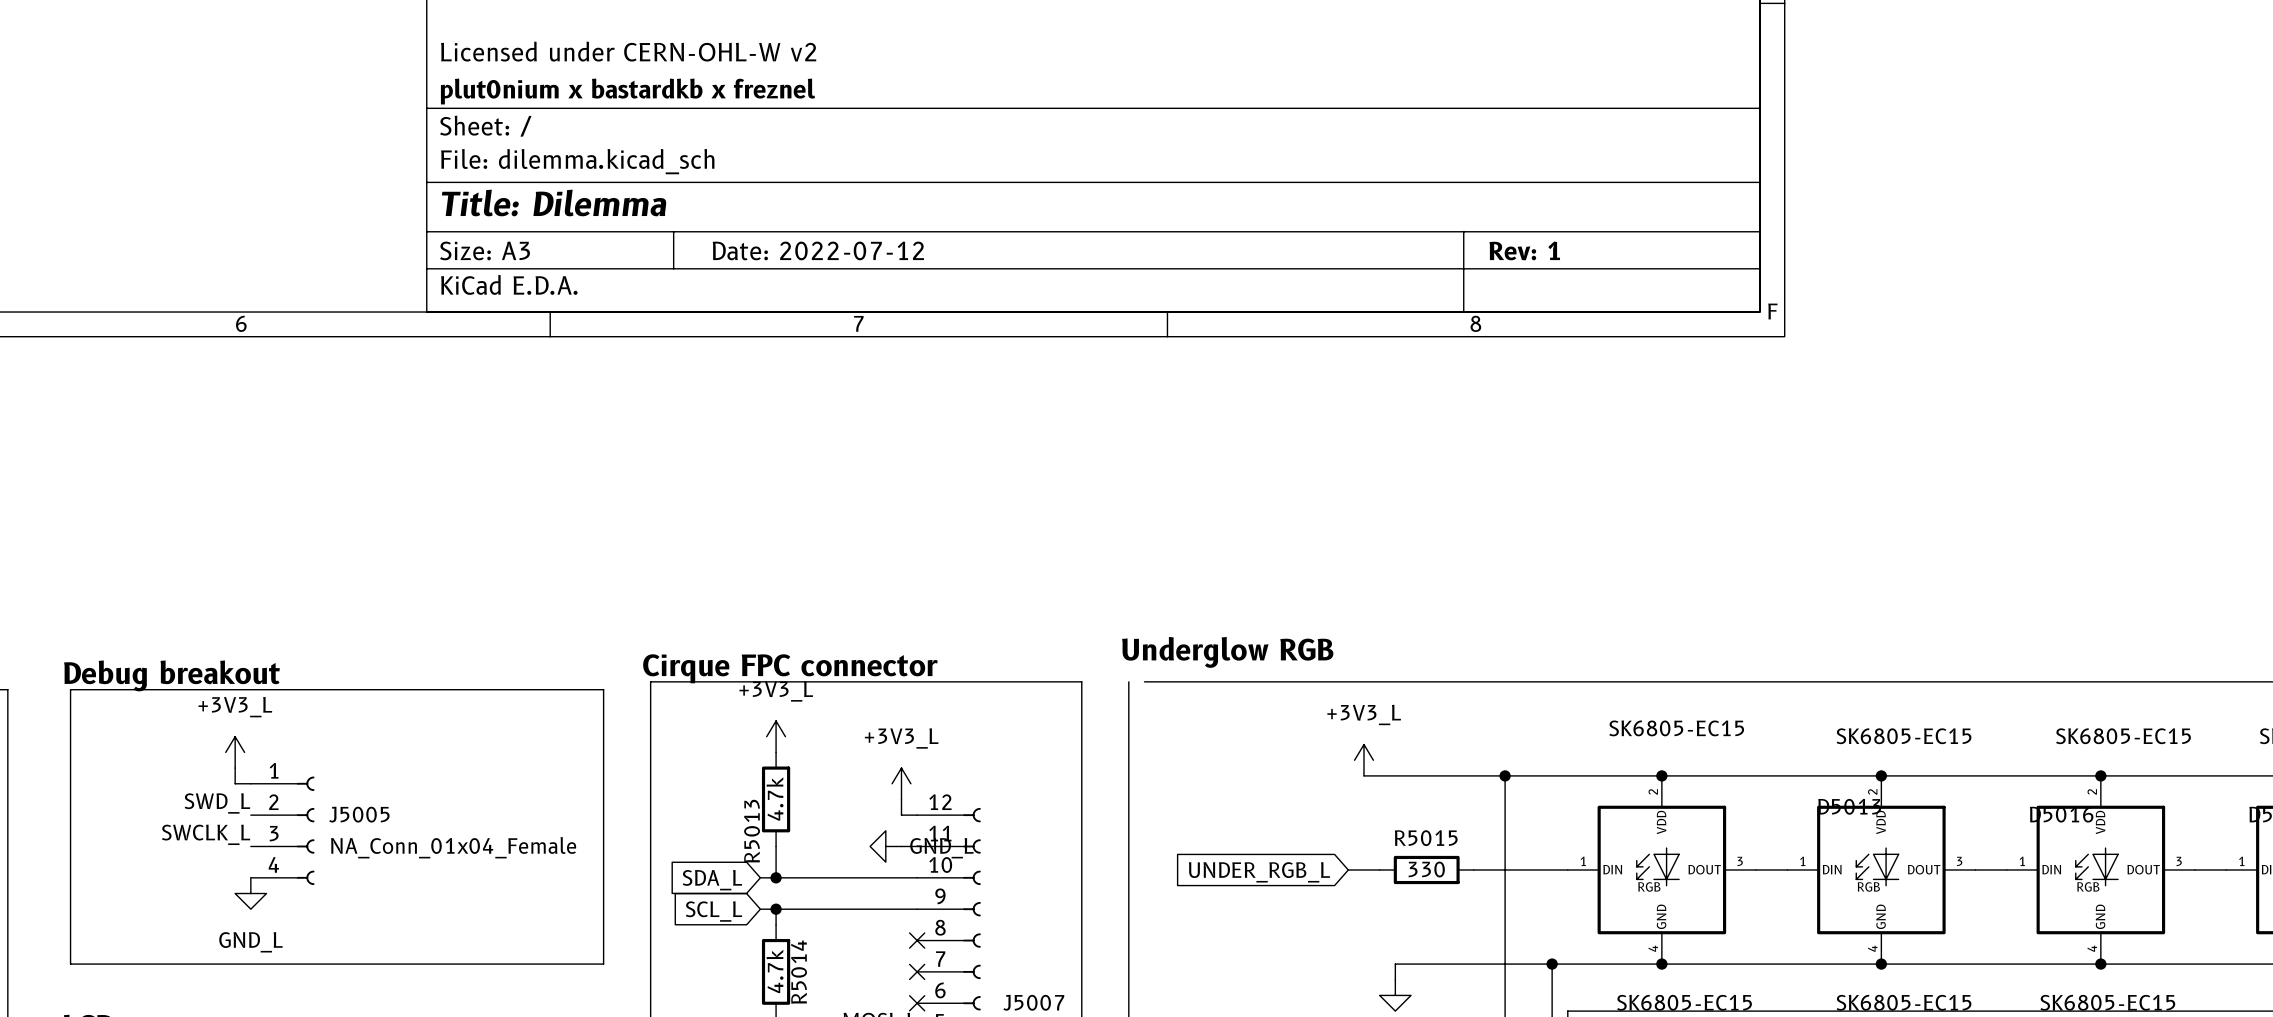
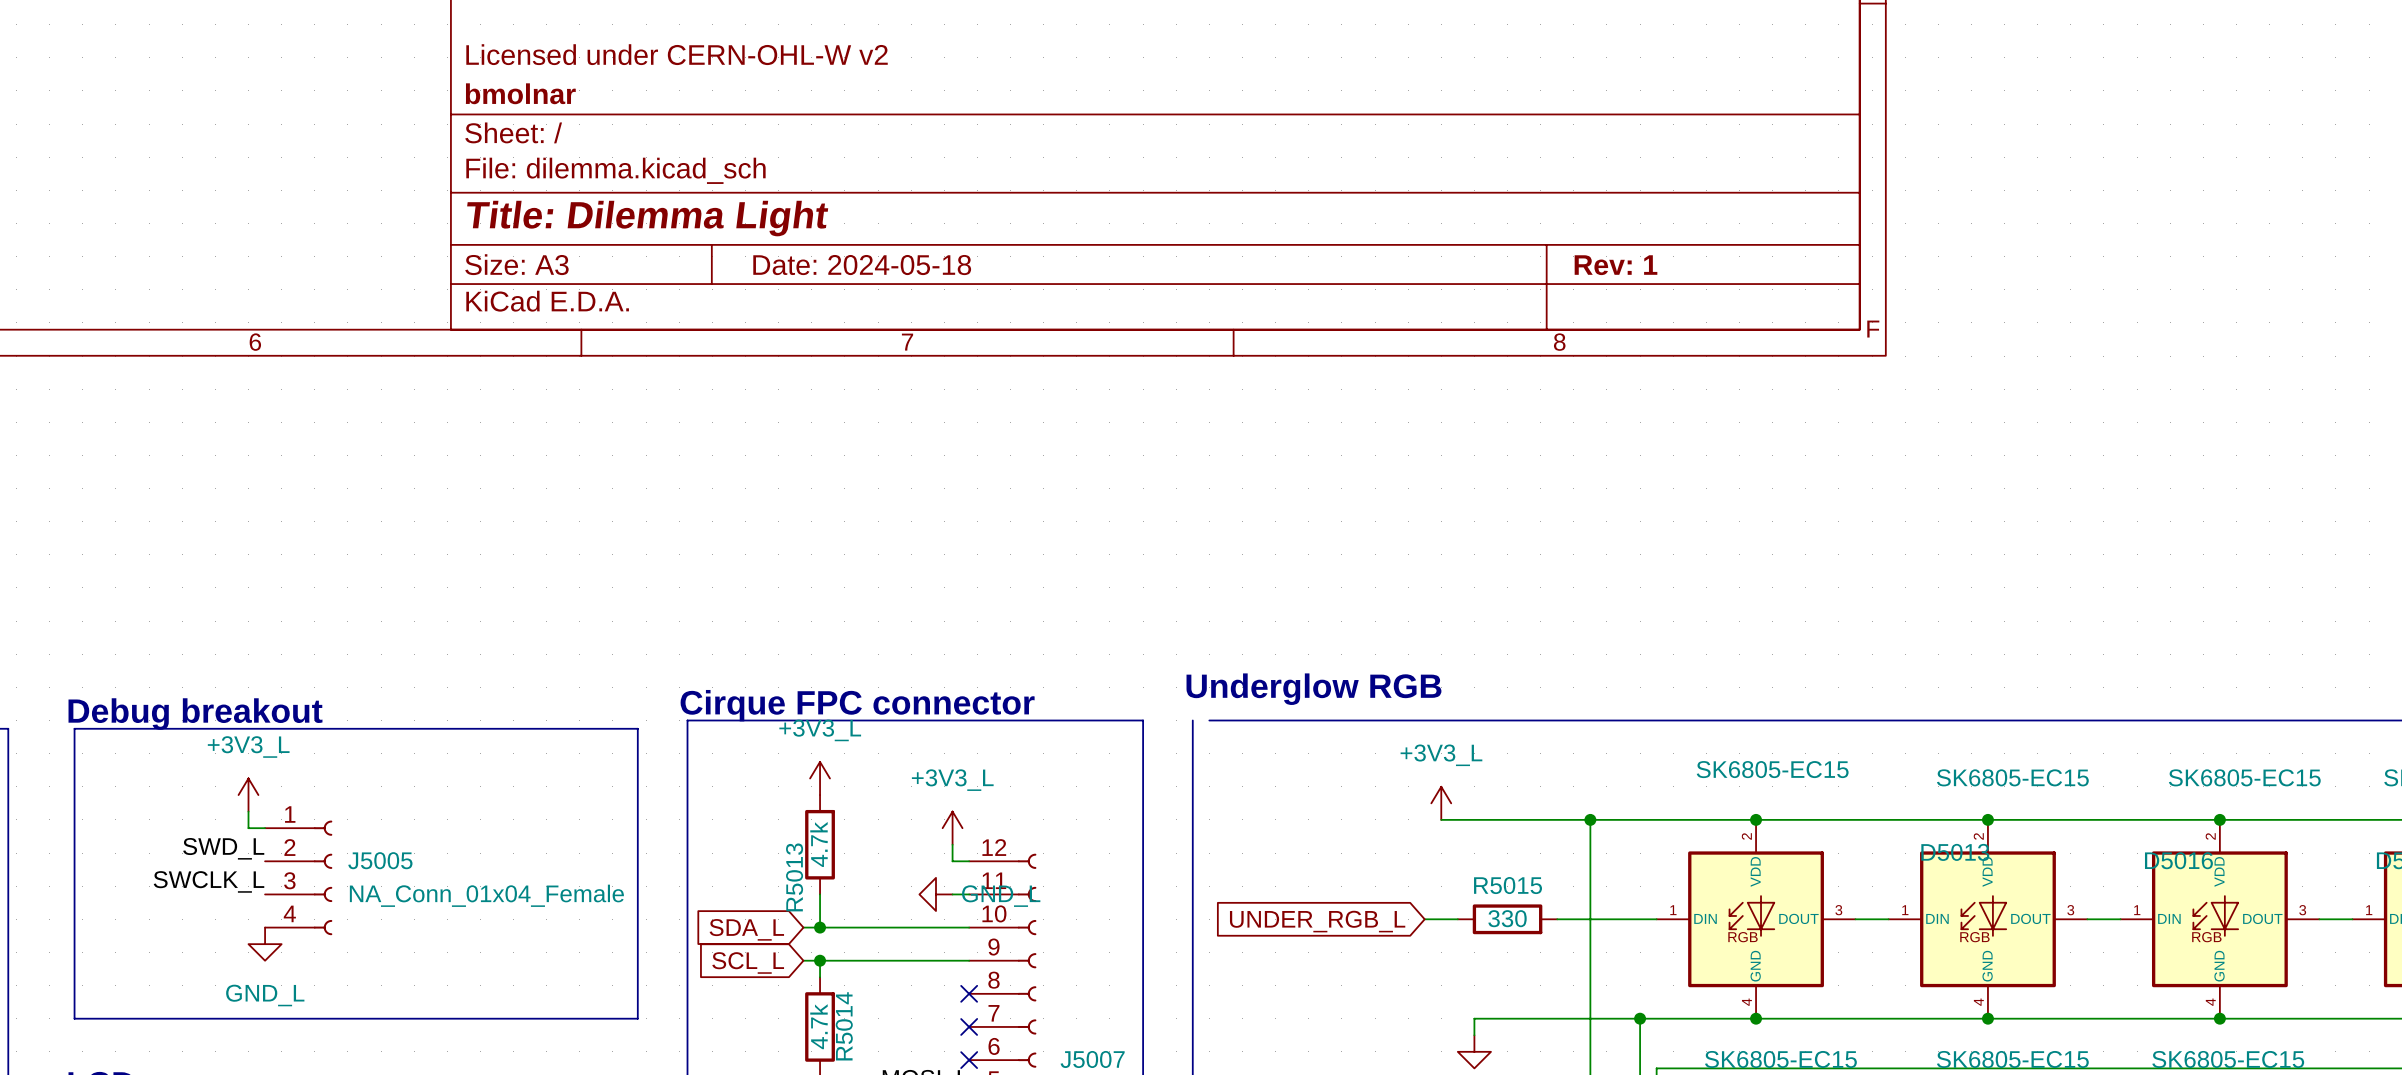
title block: plut0nium x bastardkb x freznel (628, 91) -> bmolnar (520, 93)
title block: Title: Dilemma (554, 202) -> Title: Dilemma Light (647, 218)
title block: Date: 2022-07-12 (818, 250) -> Date: 2024-05-18 (862, 265)

